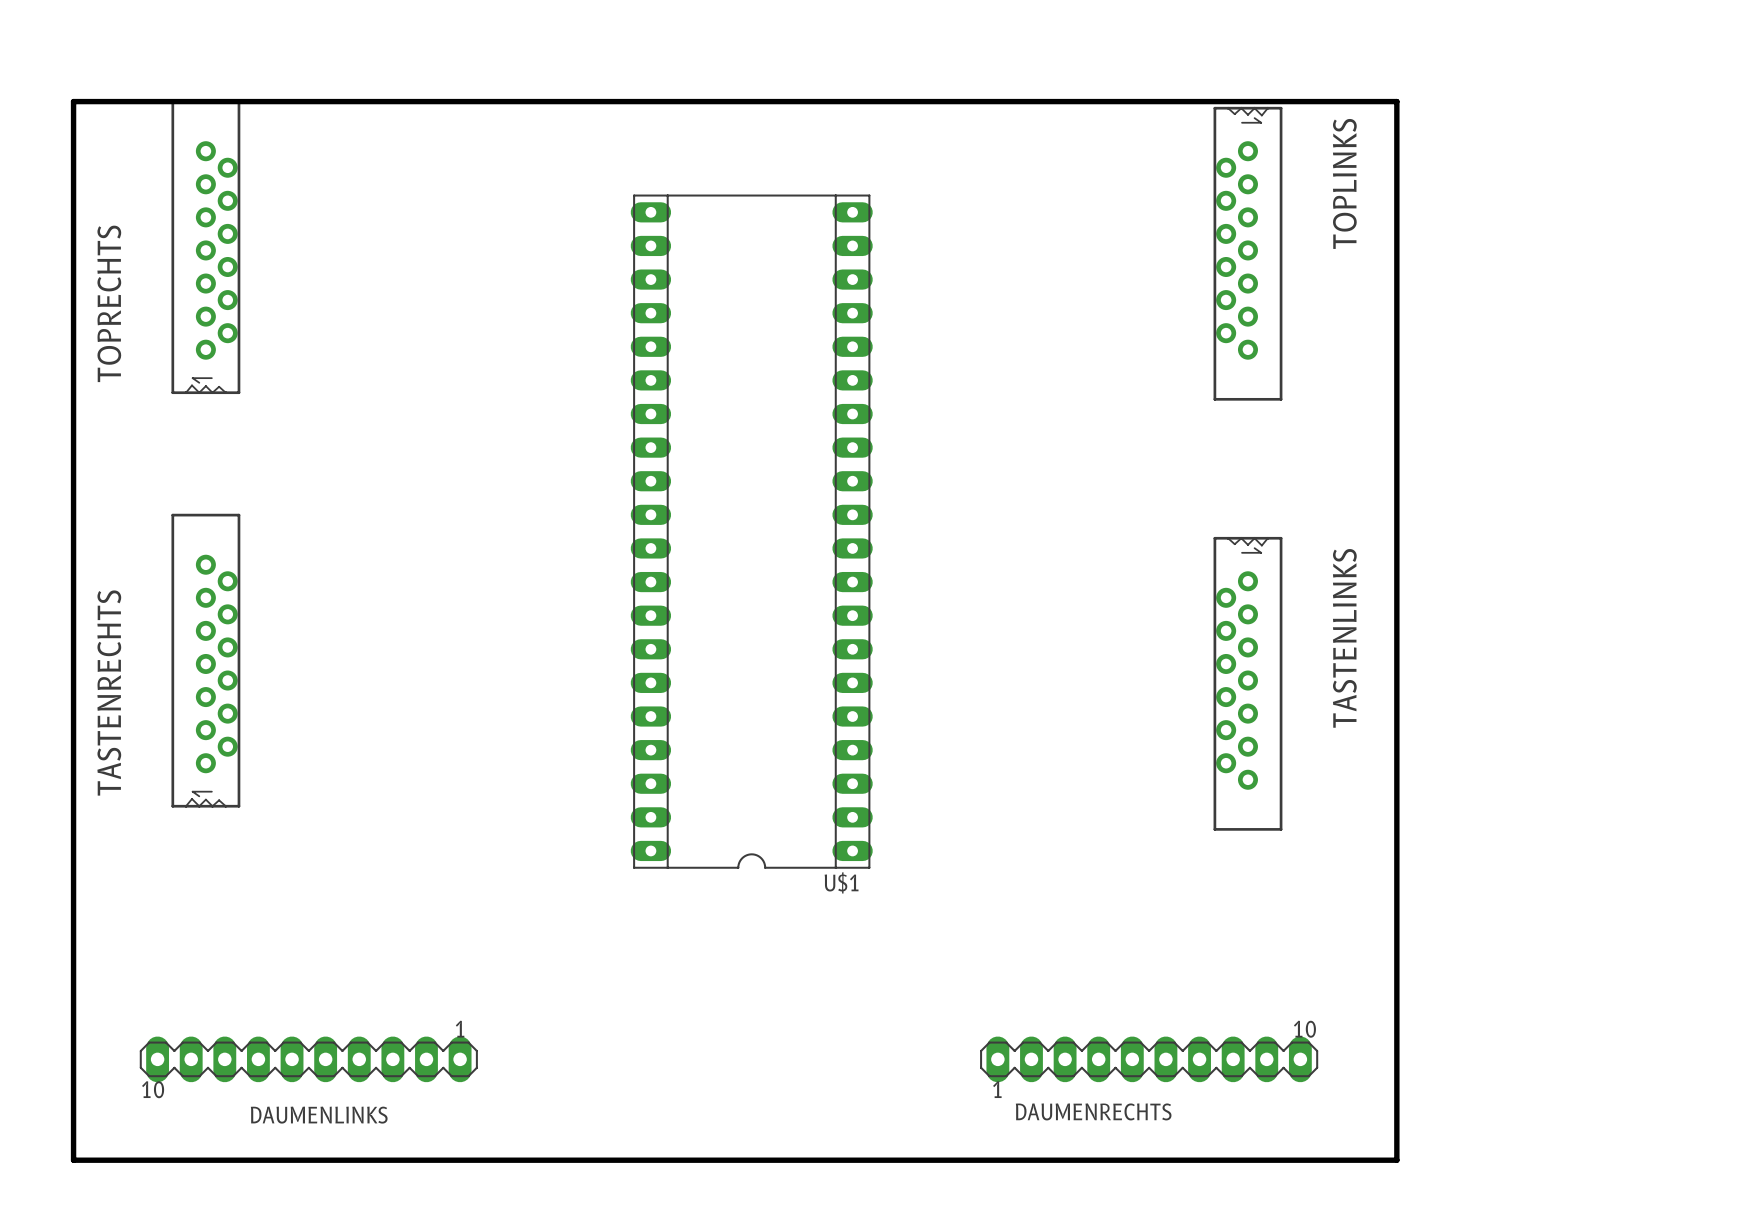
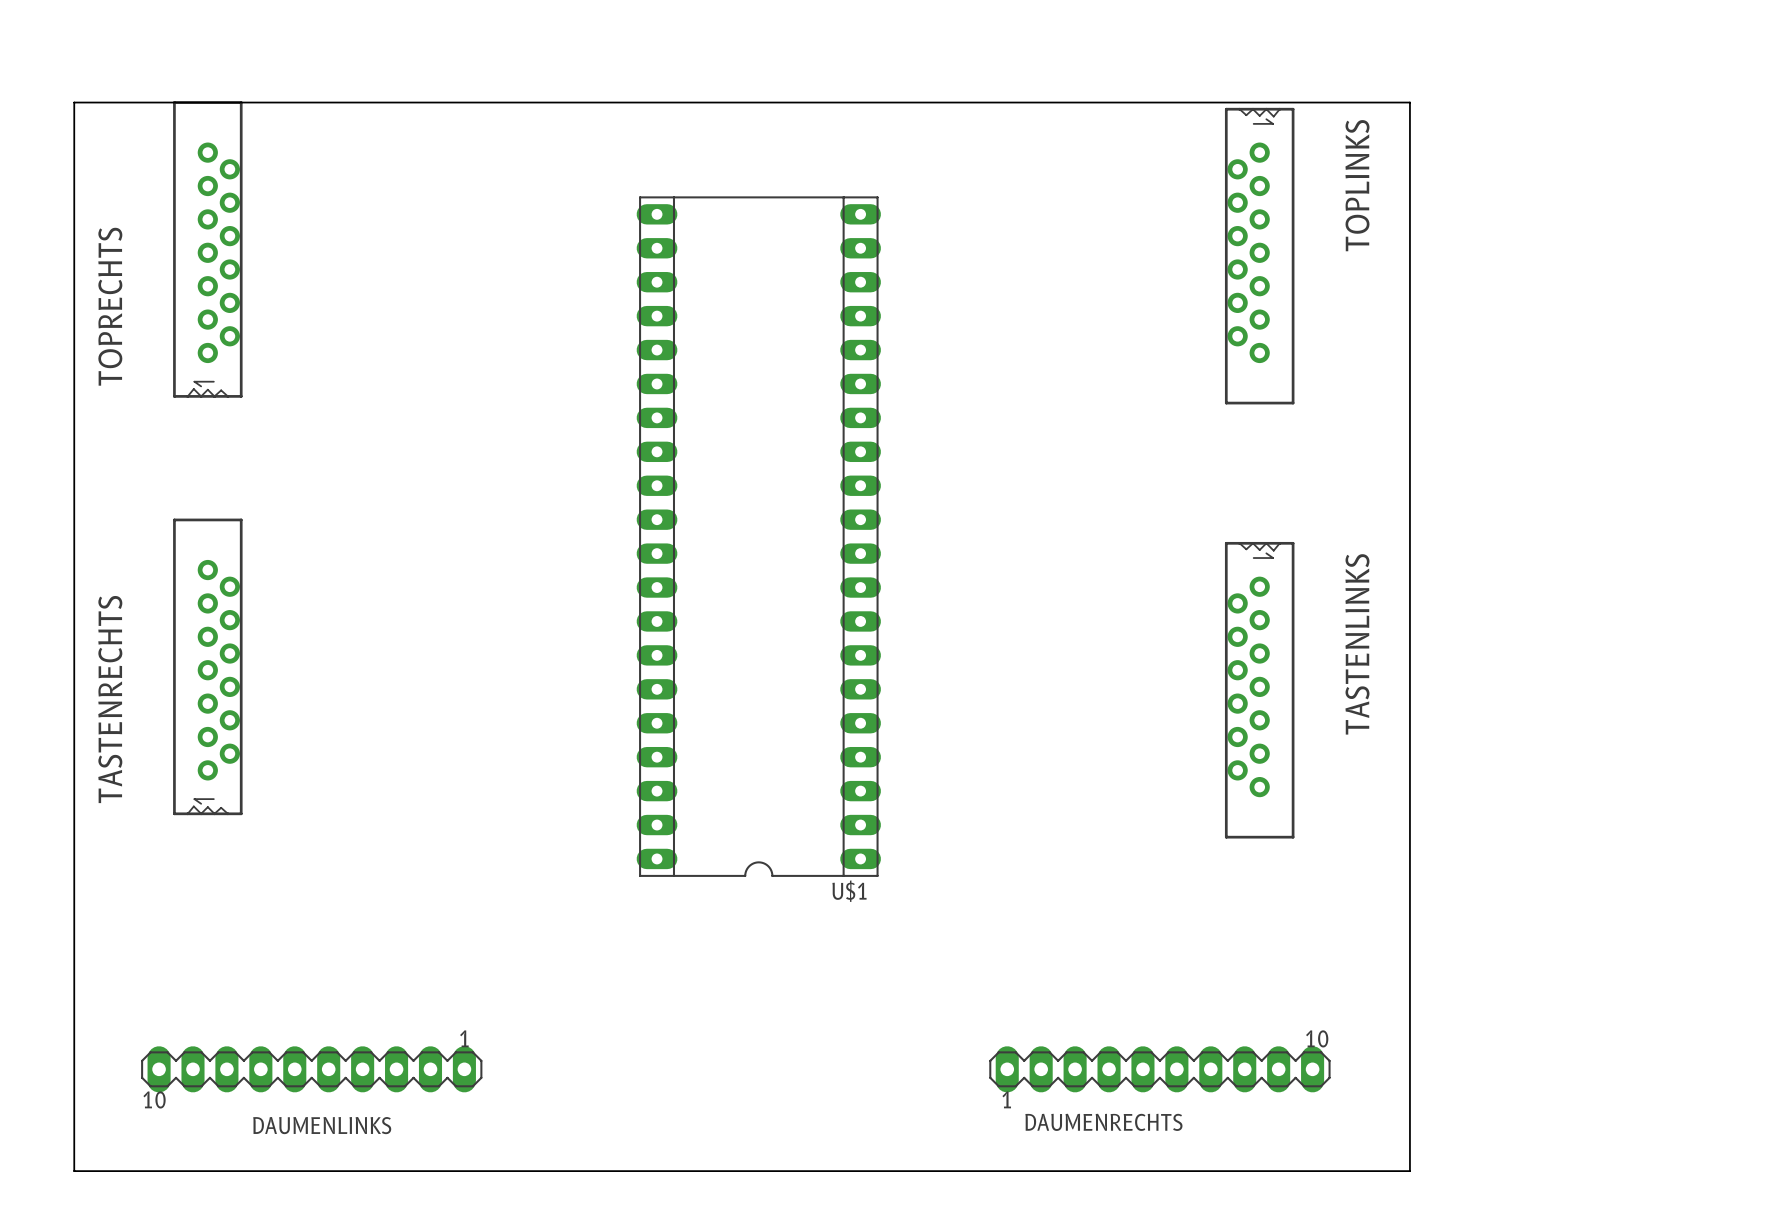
board edge width: thick (73, 101) (1396, 101) (1396, 1160) (73, 1160) (73, 101) -> thin (74, 102) (1409, 102) (1409, 1171) (74, 1171) (74, 102)

